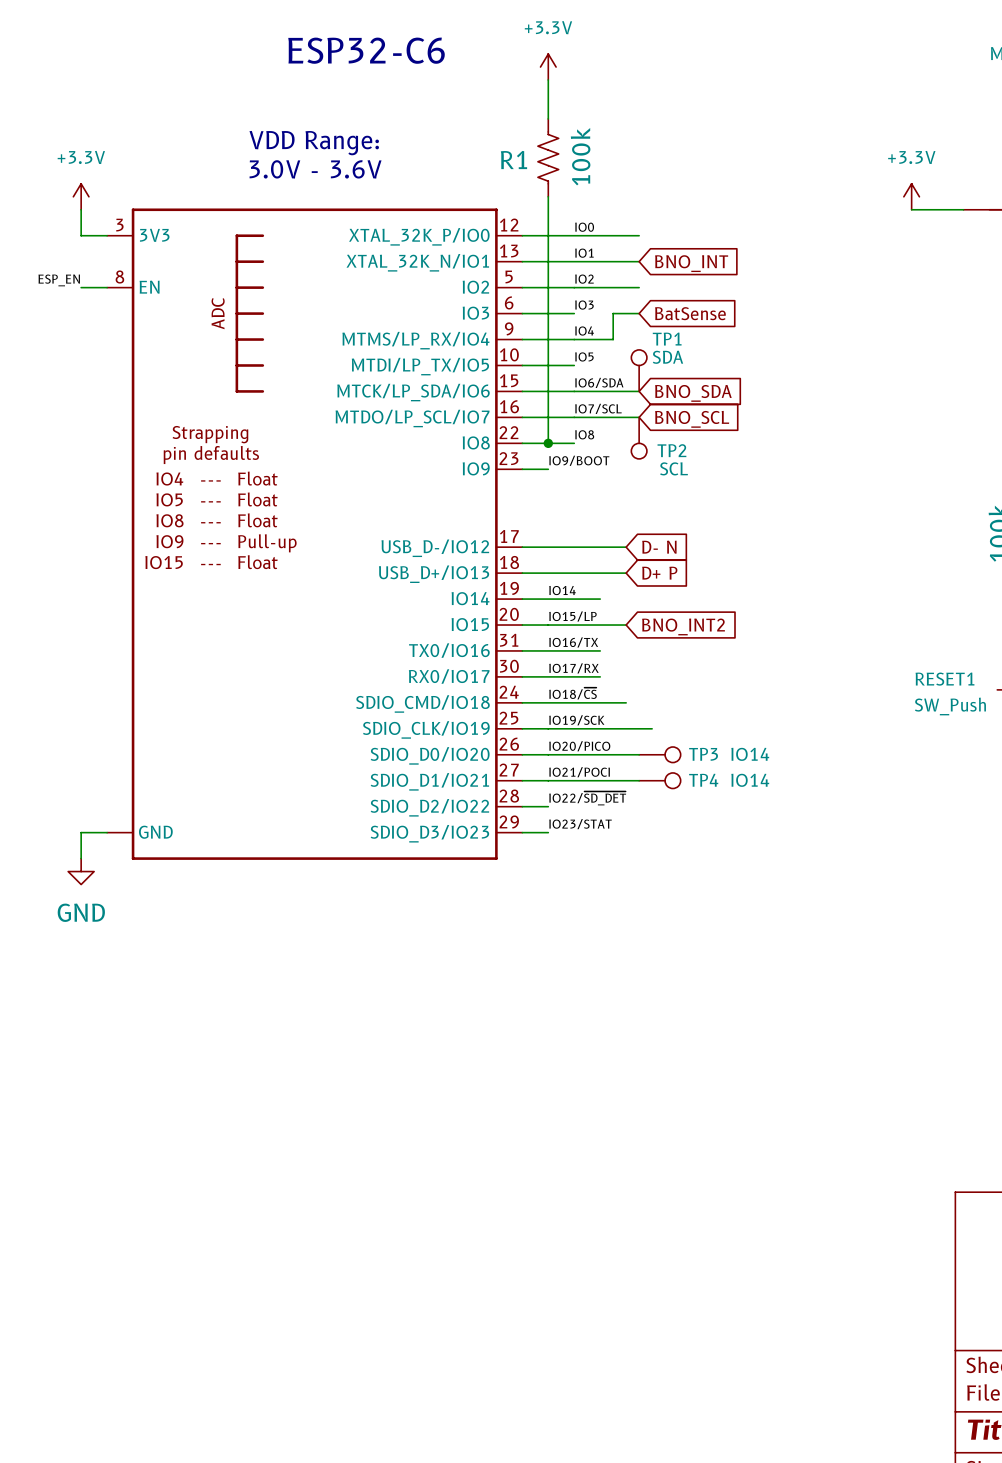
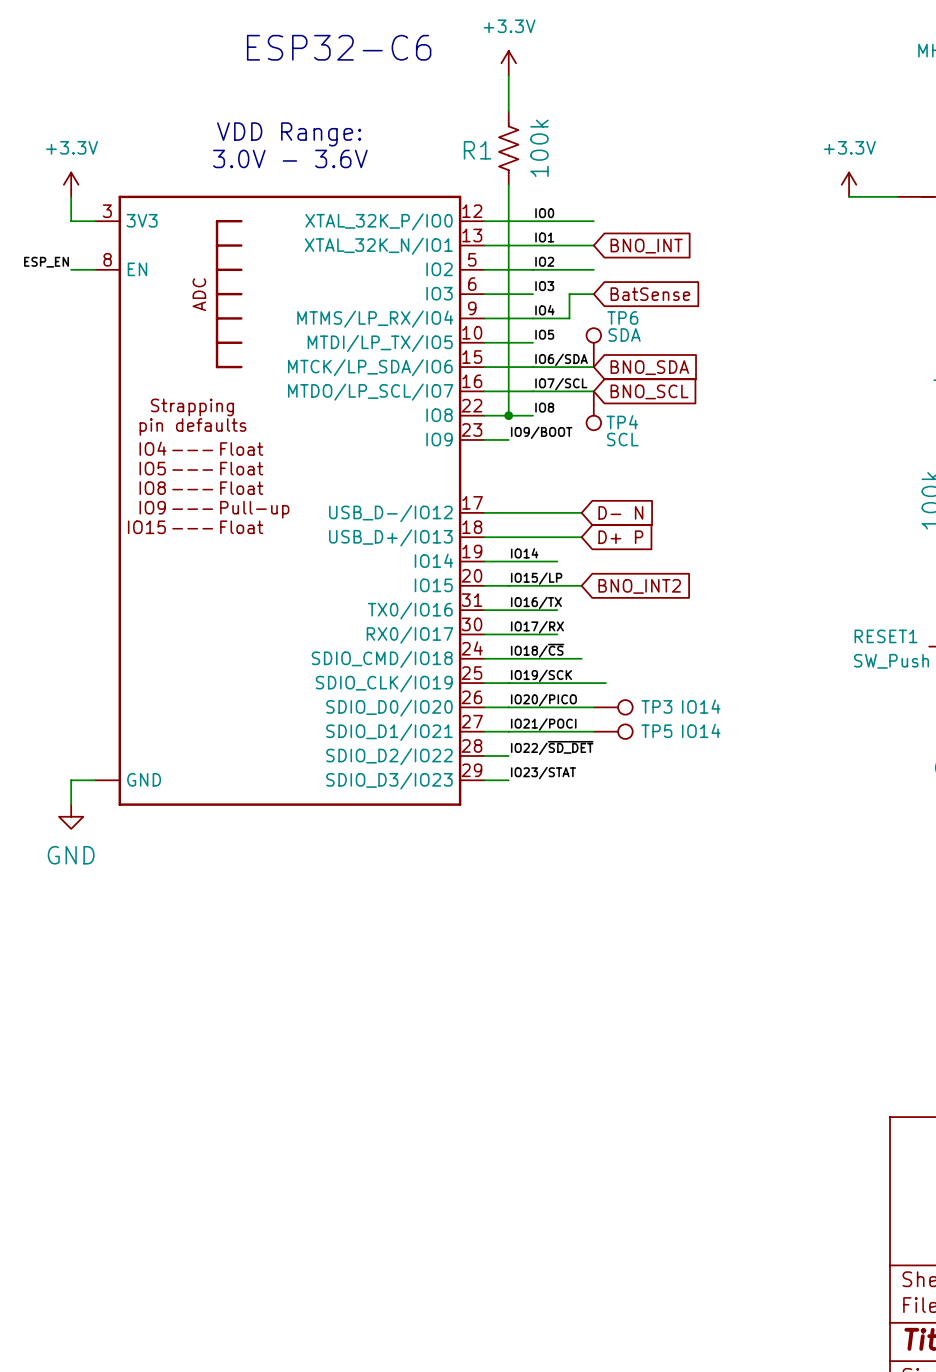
TP1 name: TP1 (667, 339) -> TP6 (622, 317)
TP2 name: TP2 (671, 450) -> TP4 (622, 422)
TP4 name: TP4 (703, 780) -> TP5 (656, 731)

